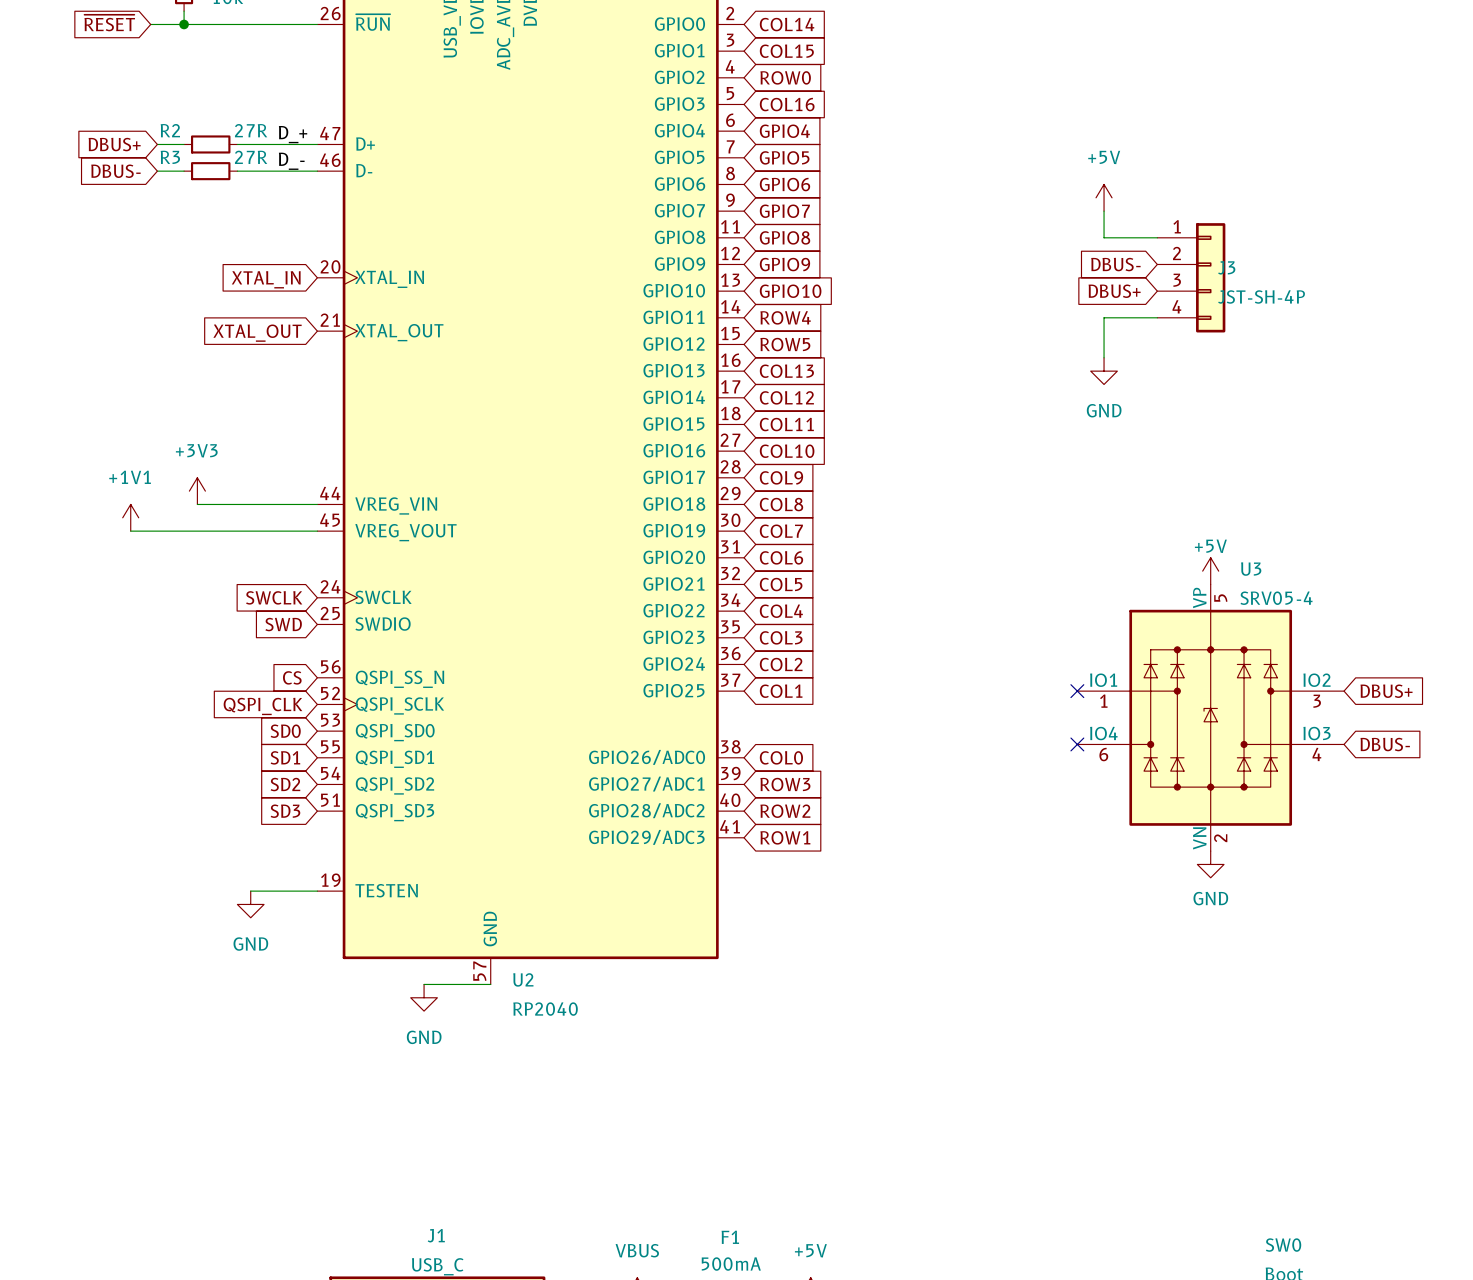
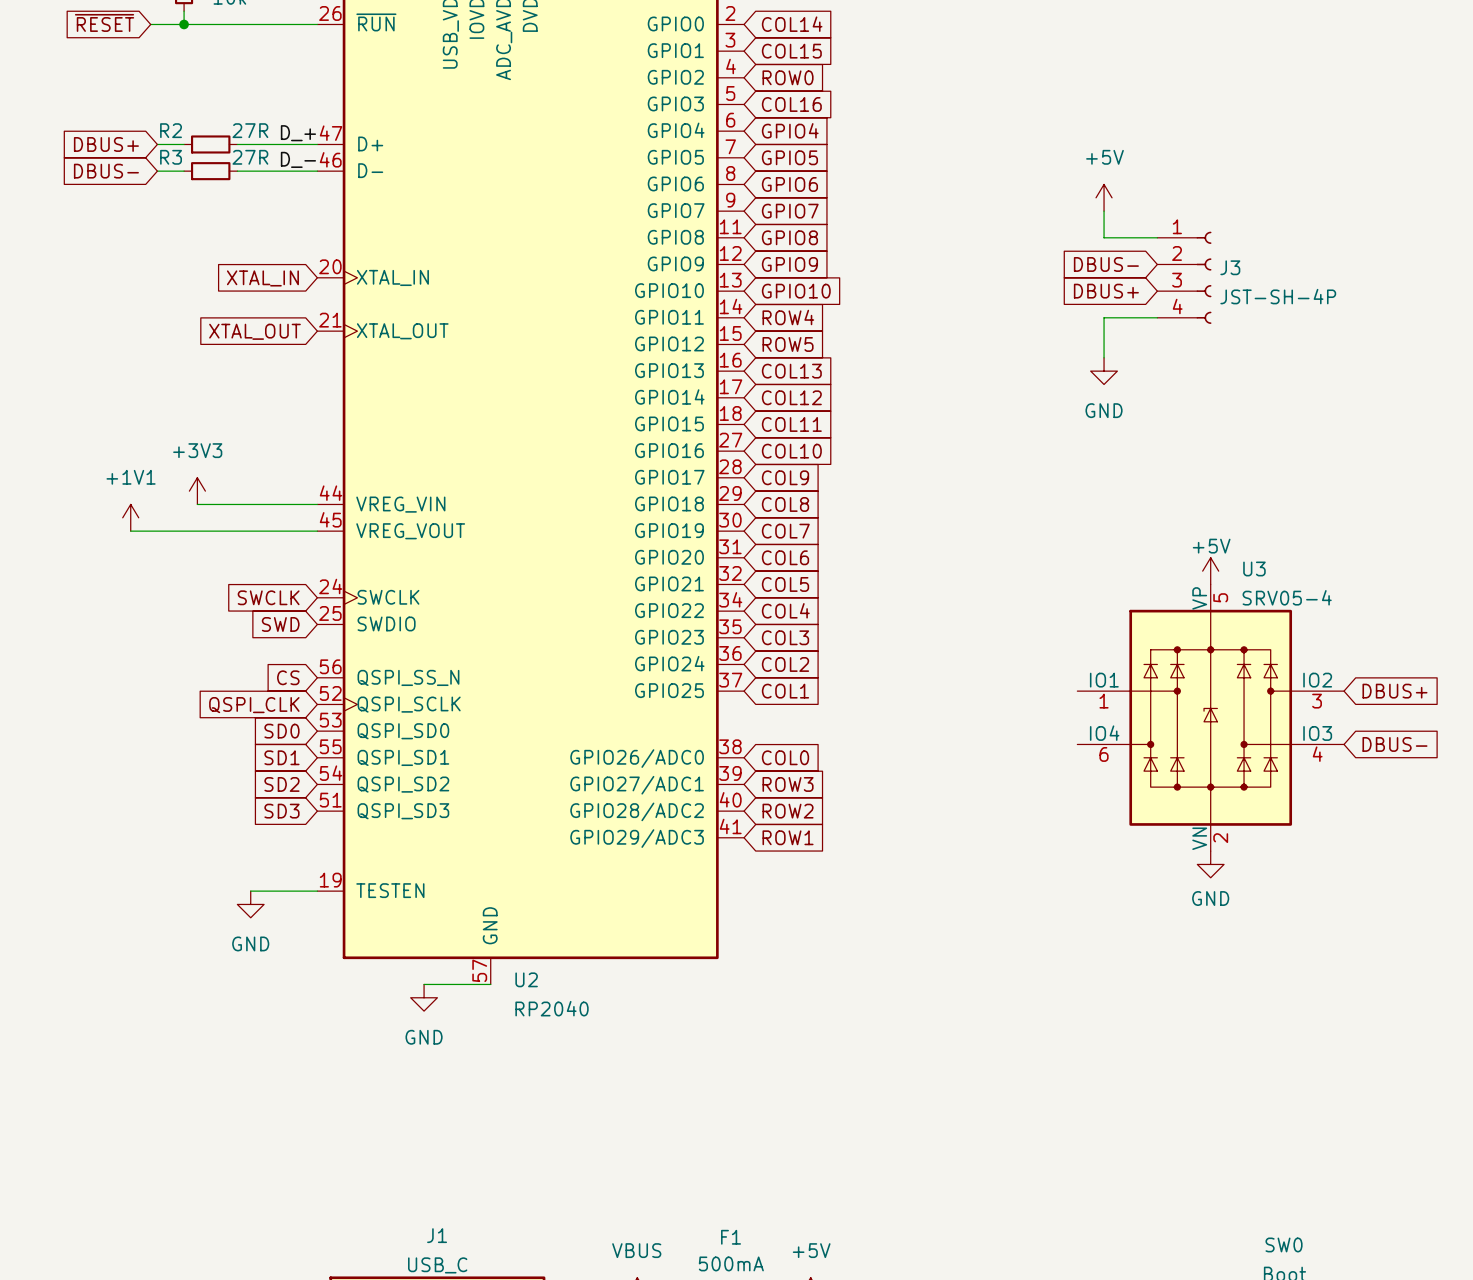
J3 symbol: [1157, 223, 1226, 333] -> [1157, 231, 1212, 324]
no-connect mark: (1077, 691) -> none
no-connect mark: (1077, 744) -> none

